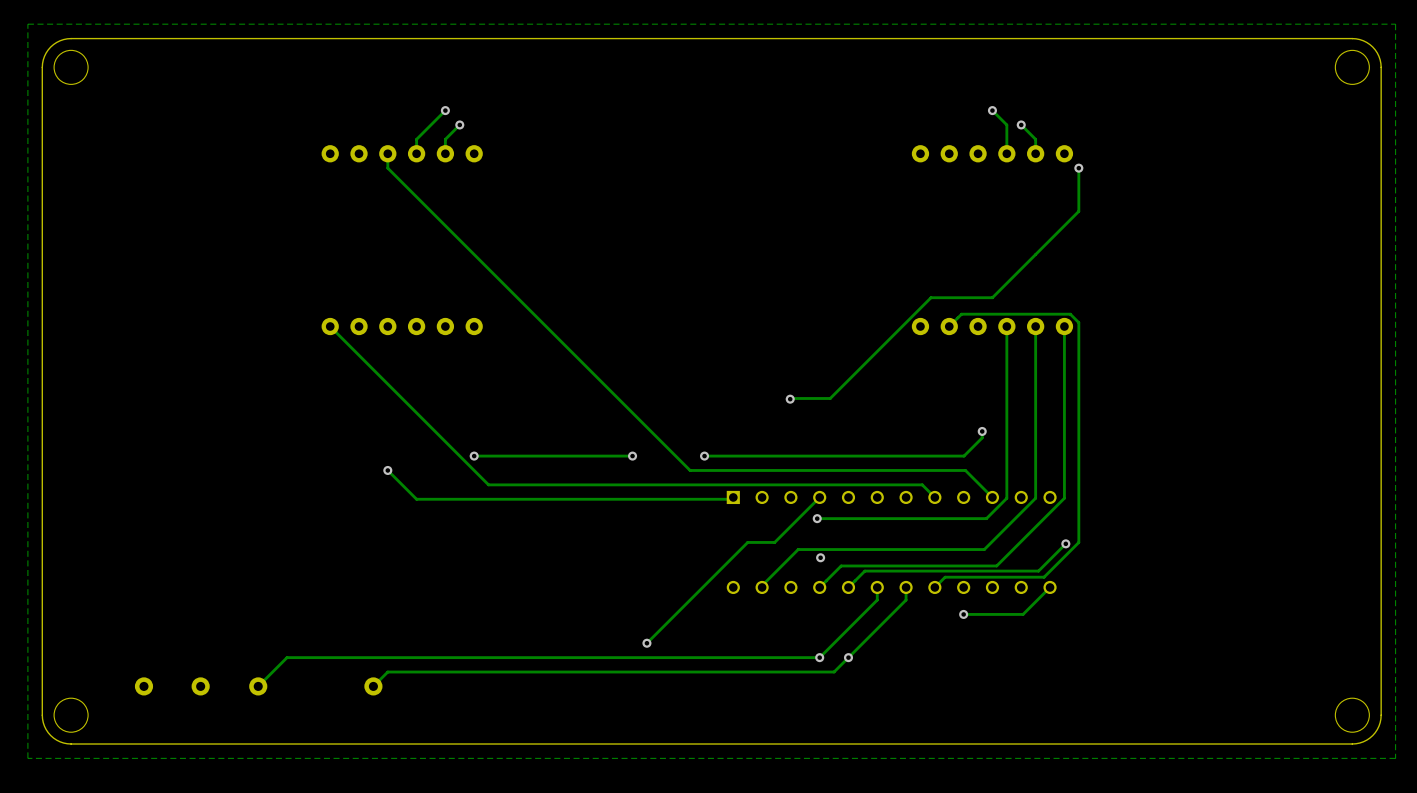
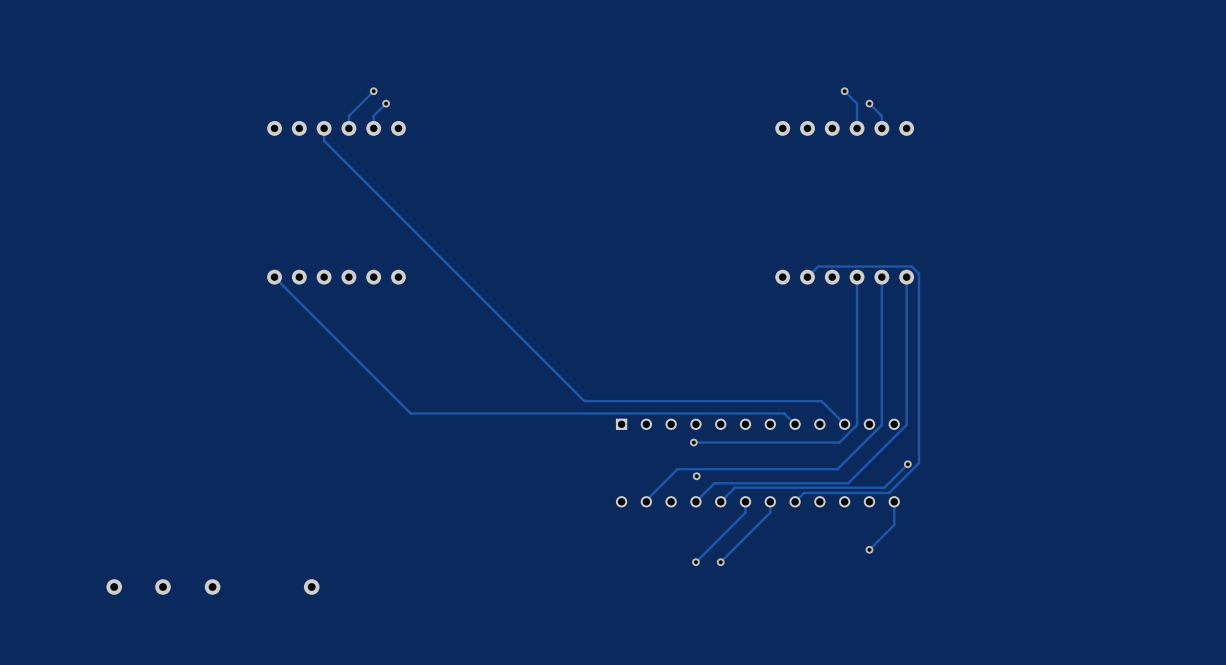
zone outline: (1395, 24) (1395, 758) (27, 758) (27, 24) (1395, 24) -> none
board edge: (1352, 38) (71, 38) (56, 42) (46, 52) (42, 67) (42, 715) (46, 729) (56, 740) (71, 744) (1352, 744) (1366, 740) (1377, 729) (1381, 715) (1381, 67) (1378, 56) (1372, 47) (1363, 40) (1352, 38) -> none
round board edge: [53, 50, 89, 85] -> none
round board edge: [1335, 50, 1370, 85] -> none
track: (1078, 168) (1078, 211) (992, 297) (931, 297) (830, 398) (790, 399) -> none
via: (1078, 168) -> none
via: (790, 399) -> none
track: (982, 431) (982, 437) (964, 456) (704, 456) -> none
via: (982, 431) -> none
via: (474, 456) -> none
track: (632, 456) (474, 456) -> none
via: (632, 456) -> none
via: (704, 456) -> none
track: (387, 470) (416, 499) (731, 499) (733, 497) -> none
via: (387, 470) -> none
track: (819, 497) (774, 542) (747, 542) (646, 643) -> none
track: (1050, 587) (1023, 614) (963, 614) -> (894, 501) (894, 525) (869, 549)
via position: (963, 614) -> (869, 549)
via: (646, 643) -> none
track: (819, 657) (287, 657) (258, 686) -> none
track: (848, 657) (834, 672) (387, 672) (373, 686) -> none
round board edge: [53, 697, 89, 733] -> none
round board edge: [1335, 697, 1370, 733] -> none

